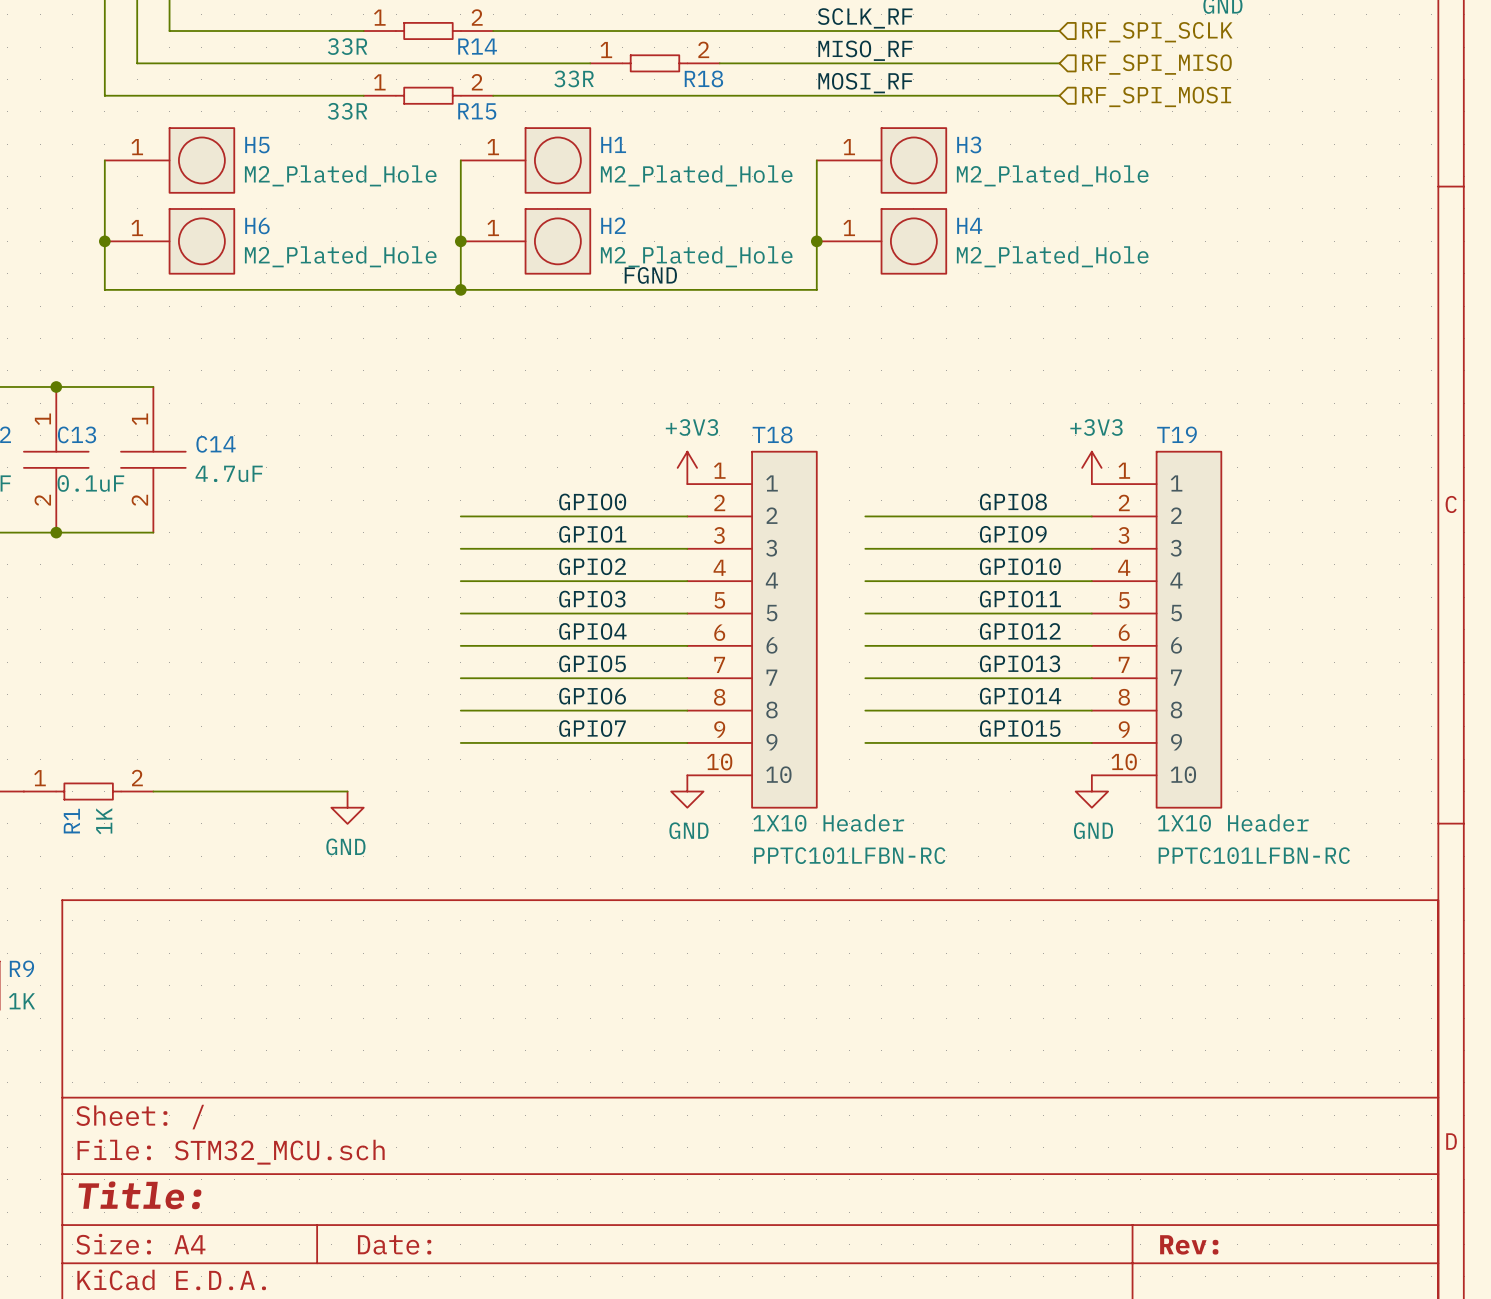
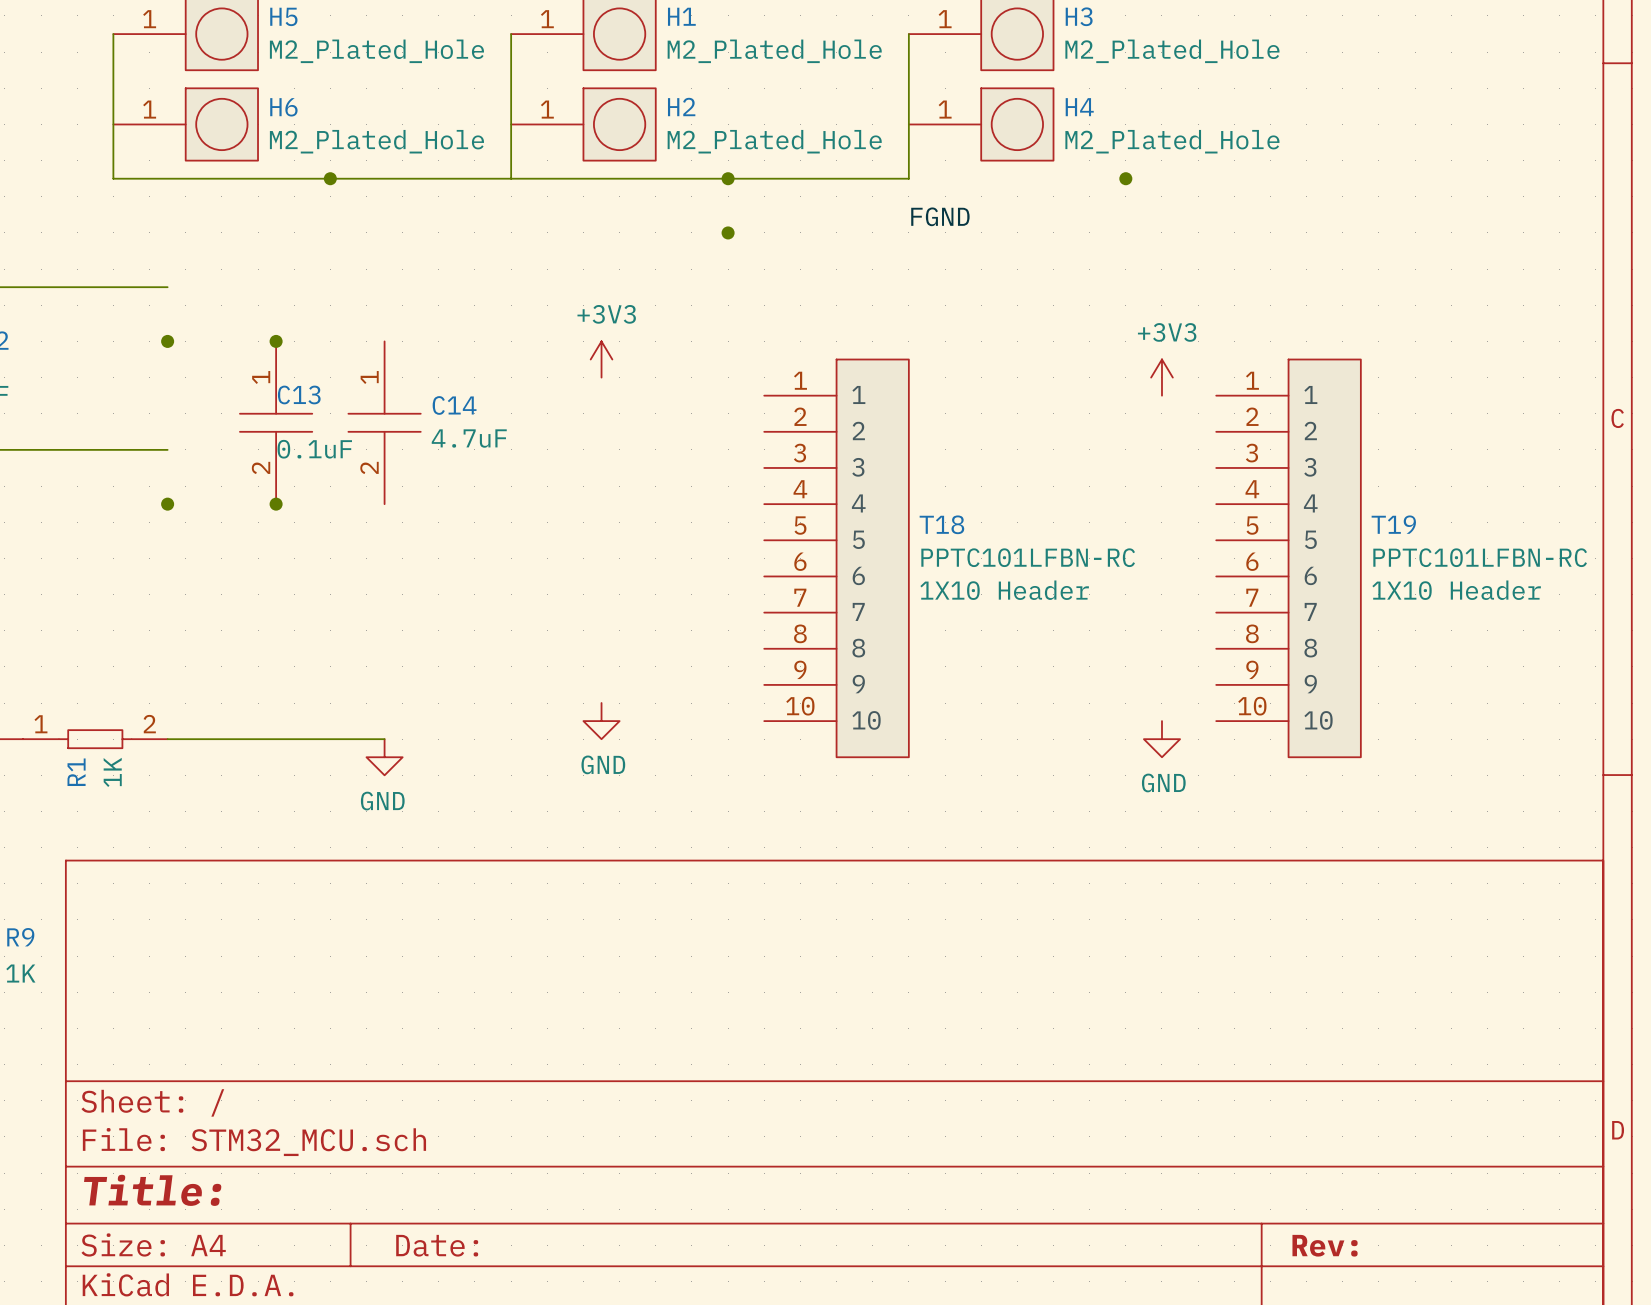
junction: (104, 241) -> none
junction: (460, 241) -> none
junction: (816, 241) -> none
label position: FGND (650, 275) -> FGND (940, 216)
junction: none -> (330, 178)
junction: (460, 289) -> none
junction: none -> (728, 178)
junction: none -> (1125, 178)
junction: none -> (728, 232)
junction: (56, 386) -> none
T18 name position: T18 (772, 434) -> T18 (941, 524)
T19 name position: T19 (1177, 434) -> T19 (1393, 524)
junction: none -> (167, 341)
junction: none -> (276, 341)
C13 position: (56, 459) -> (276, 422)
C14 position: (153, 459) -> (384, 422)
power symbol position: +3V3 (687, 467) -> +3V3 (601, 359)
power symbol position: +3V3 (1091, 467) -> +3V3 (1161, 377)
label: GPIO0 (592, 501) -> none
label: GPIO8 (1013, 501) -> none
wire: (460, 516) (687, 516) -> none
wire: (865, 516) (1091, 516) -> none
junction: (56, 532) -> none
label: GPIO1 (592, 534) -> none
label: GPIO9 (1013, 534) -> none
wire: (460, 548) (687, 548) -> none
wire: (865, 548) (1091, 548) -> none
label: GPIO2 (592, 566) -> none
label: GPIO10 (1020, 566) -> none
junction: none -> (167, 504)
junction: none -> (276, 504)
wire: (460, 581) (687, 581) -> none
wire: (865, 581) (1091, 581) -> none
label: GPIO3 (592, 599) -> none
label: GPIO11 (1020, 599) -> none
wire: (460, 613) (687, 613) -> none
wire: (865, 613) (1091, 613) -> none
label: GPIO4 (592, 631) -> none
label: GPIO12 (1020, 631) -> none
wire: (460, 645) (687, 645) -> none
wire: (865, 645) (1091, 645) -> none
label: GPIO5 (592, 663) -> none
label: GPIO13 (1020, 663) -> none
wire: (460, 678) (687, 678) -> none
wire: (865, 678) (1091, 678) -> none
label: GPIO6 (592, 696) -> none
label: GPIO14 (1020, 696) -> none
wire: (460, 710) (687, 710) -> none
wire: (865, 710) (1091, 710) -> none
label: GPIO7 (592, 728) -> none
label: GPIO15 (1020, 728) -> none
wire: (460, 742) (687, 742) -> none
wire: (865, 742) (1091, 742) -> none
power symbol position: GND (687, 791) -> GND (601, 721)
power symbol position: GND (1091, 791) -> GND (1161, 739)
T18 text position: 1X10 Header (828, 822) -> 1X10 Header (1004, 590)
T19 text position: 1X10 Header (1233, 822) -> 1X10 Header (1456, 590)
T18 value position: PPTC101LFBN-RC (849, 855) -> PPTC101LFBN-RC (1028, 557)
T19 value position: PPTC101LFBN-RC (1254, 855) -> PPTC101LFBN-RC (1480, 557)

